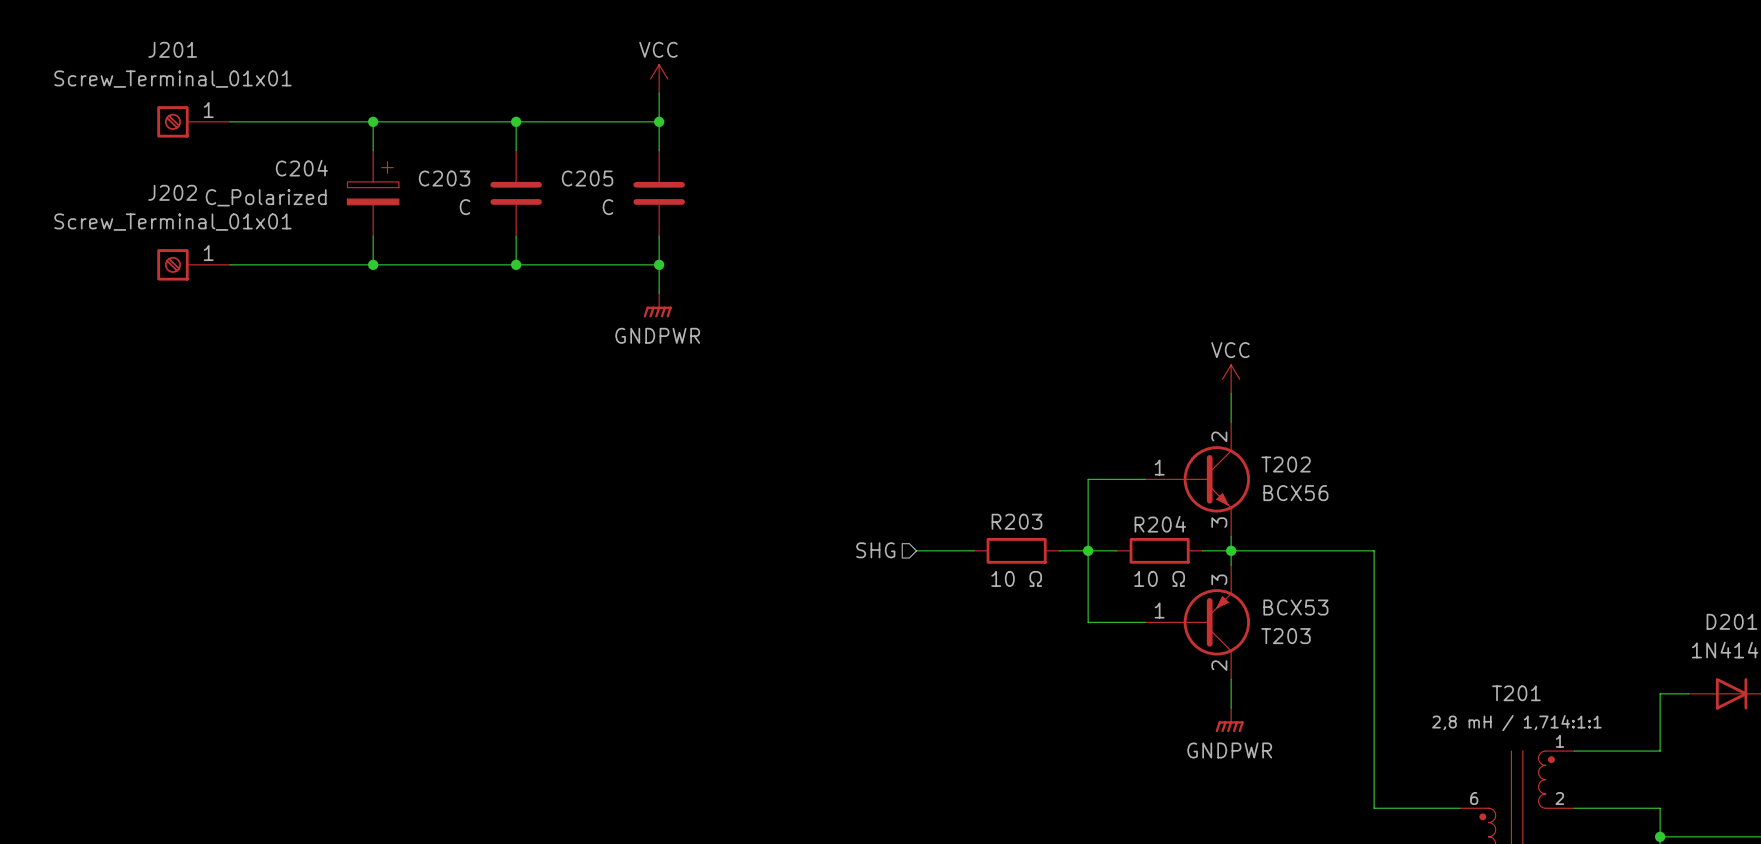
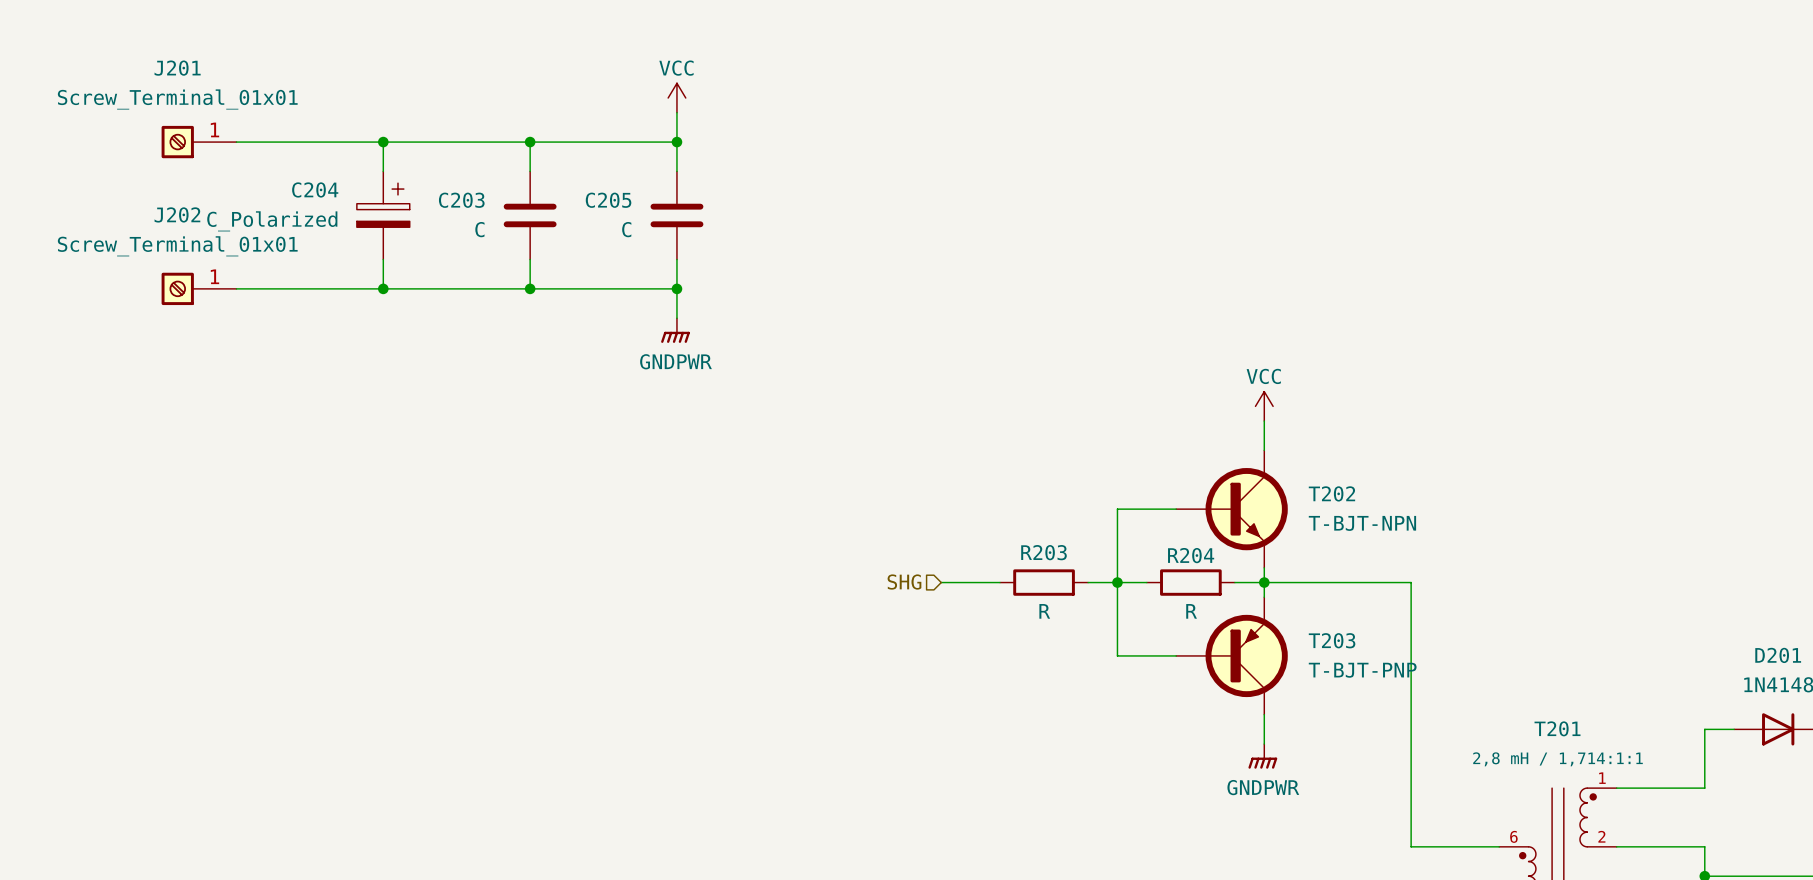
T202 symbol: [1145, 422, 1251, 537] -> [1176, 450, 1288, 568]
T202 value: BCX56 (1295, 493) -> T-BJT-NPN (1362, 523)
T203 symbol: [1145, 565, 1251, 680] -> [1176, 597, 1288, 715]
R203 value: 10 Ω (1016, 578) -> R (1044, 611)
R204 value: 10 Ω (1159, 578) -> R (1191, 611)
T203 value: BCX53 (1295, 607) -> T-BJT-PNP (1362, 670)
T203 name position: T203 (1286, 636) -> T203 (1332, 640)

